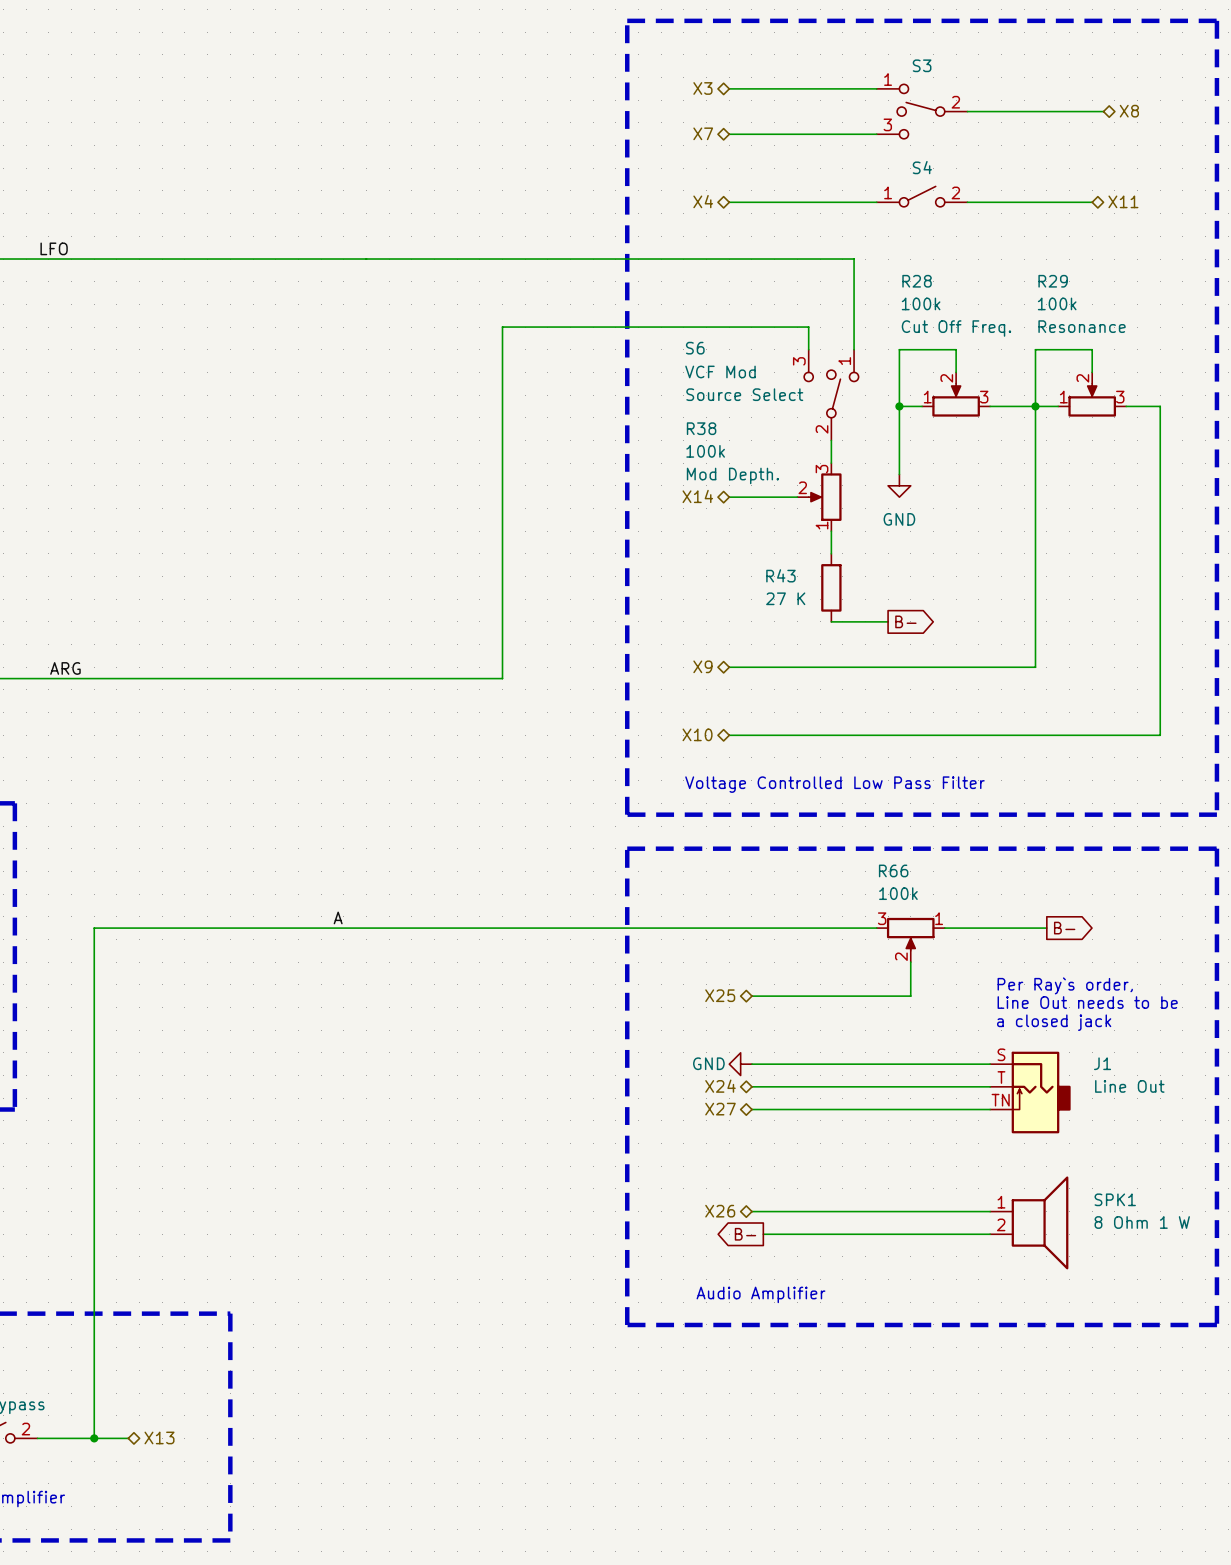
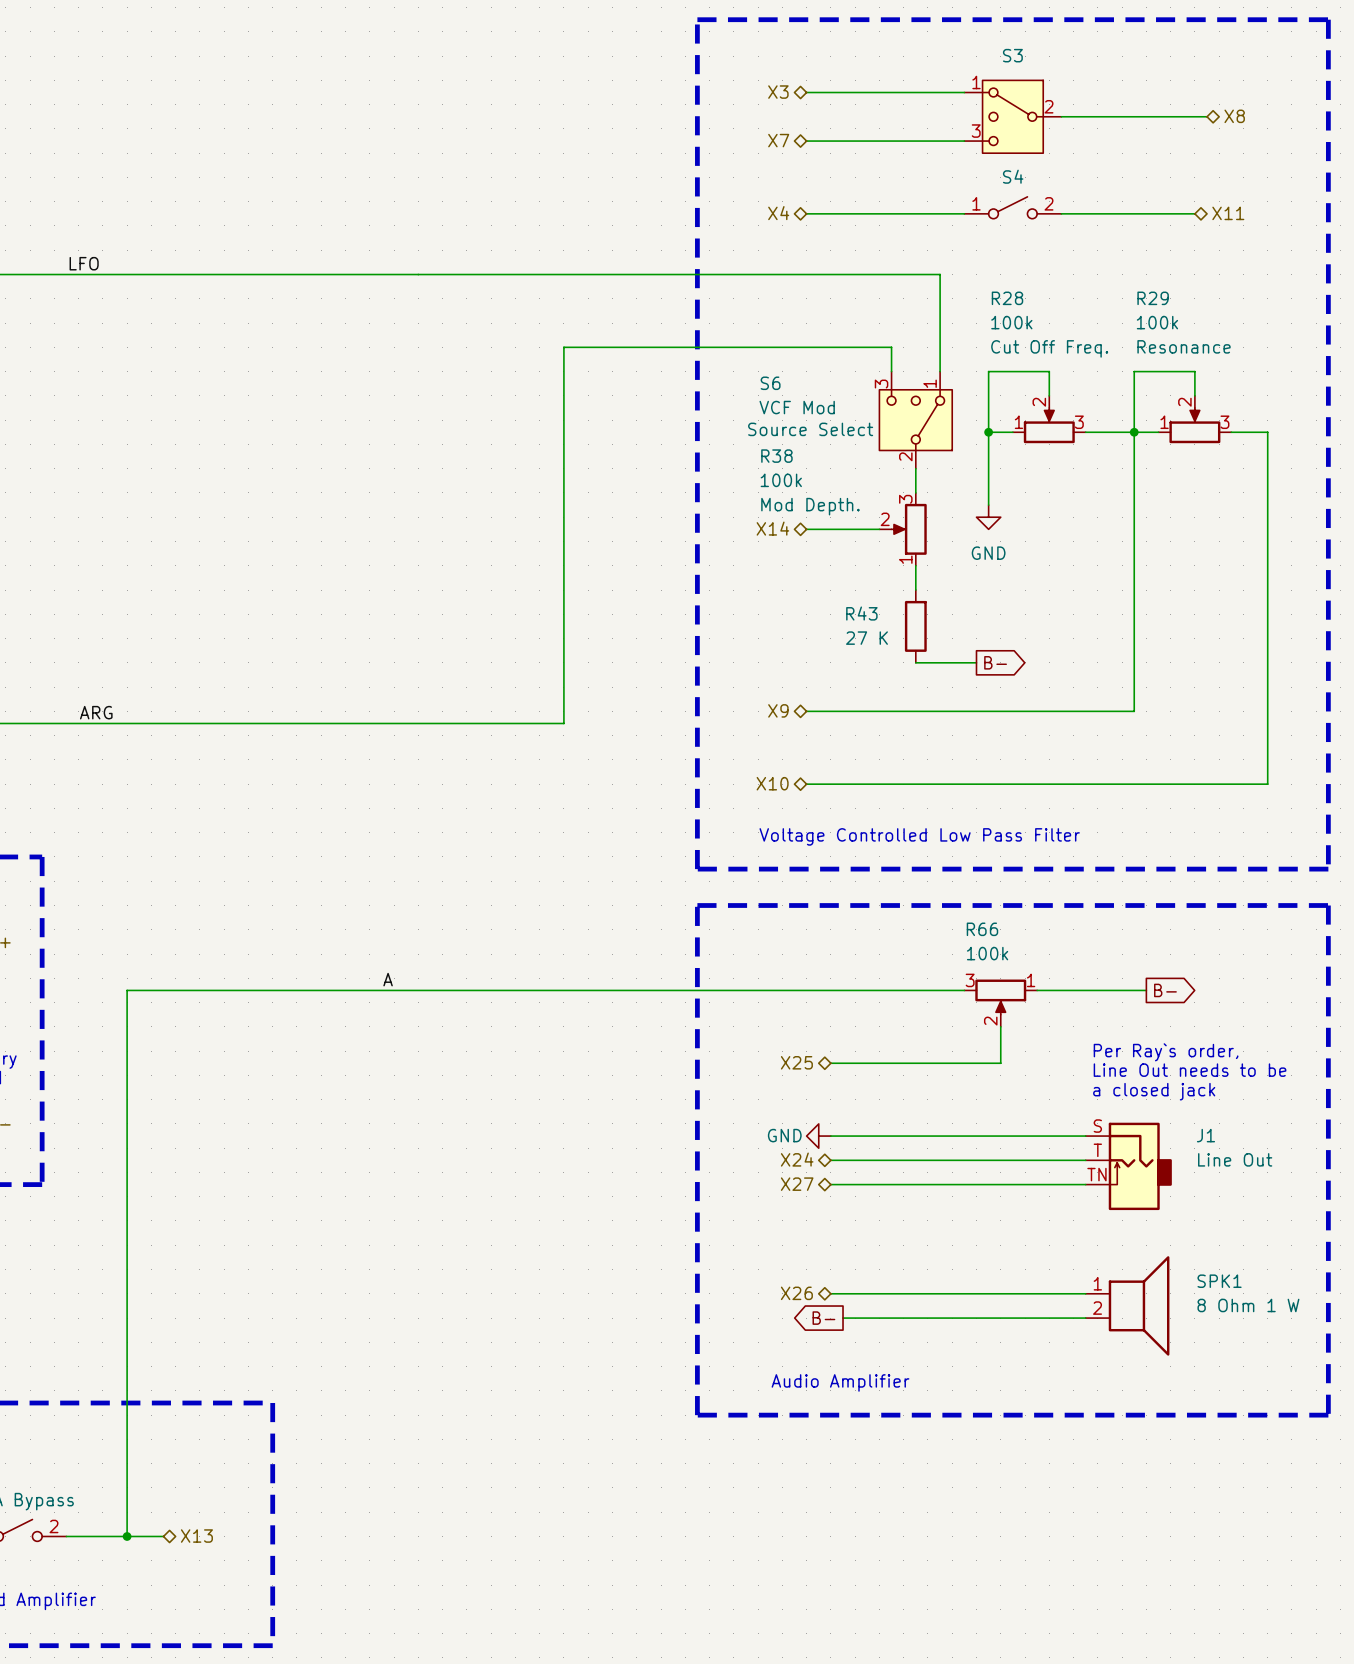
S3 symbol: [876, 84, 968, 139] -> [964, 80, 1062, 154]
S6 symbol: [804, 349, 859, 441] -> [879, 371, 953, 469]
S6 text: Source Select (744, 394) -> none
S6 text: none -> Source Select (810, 429)

